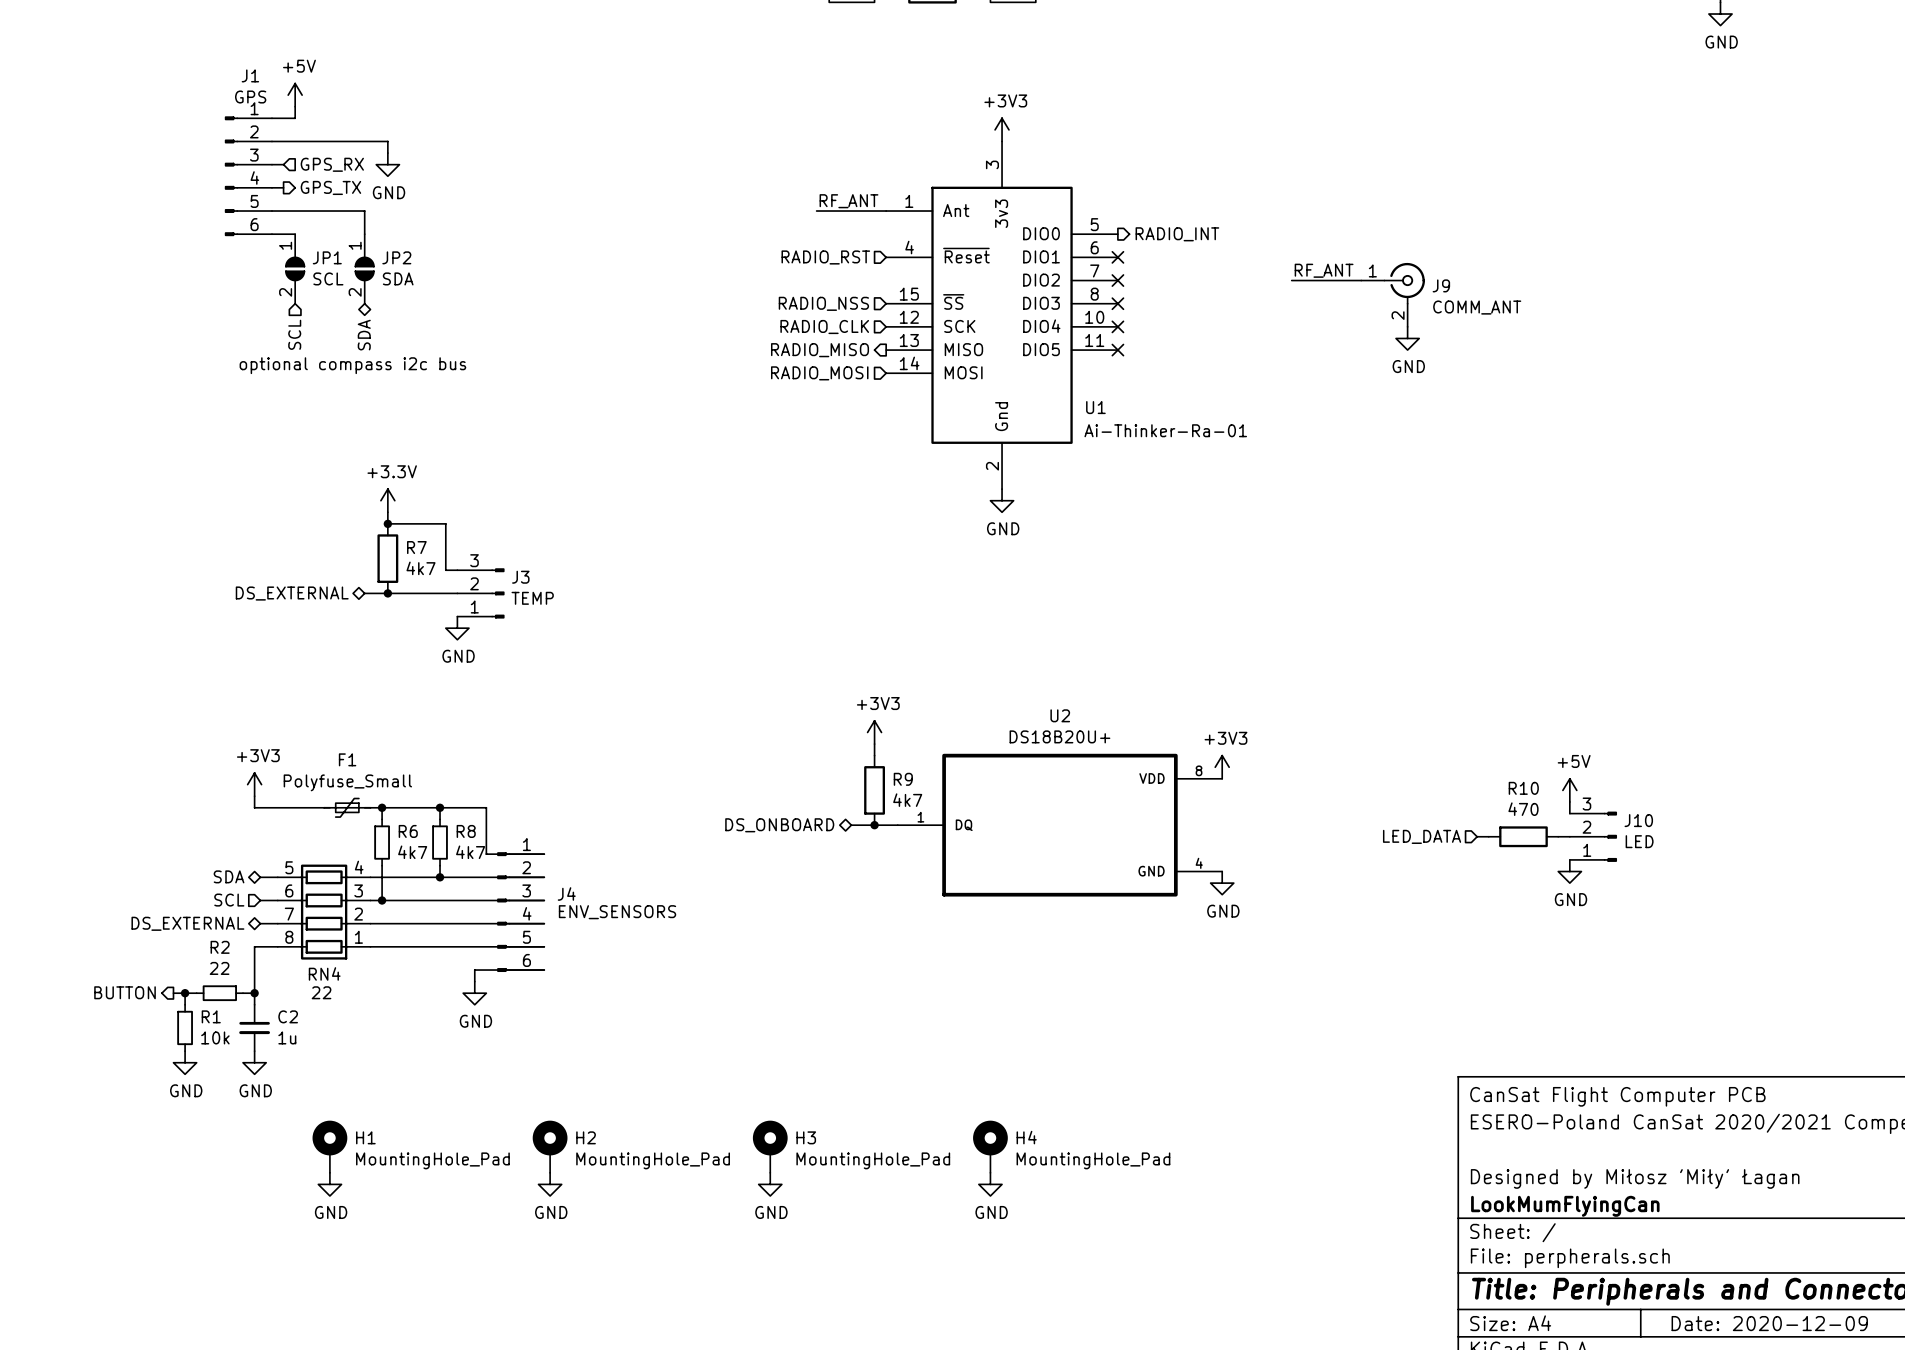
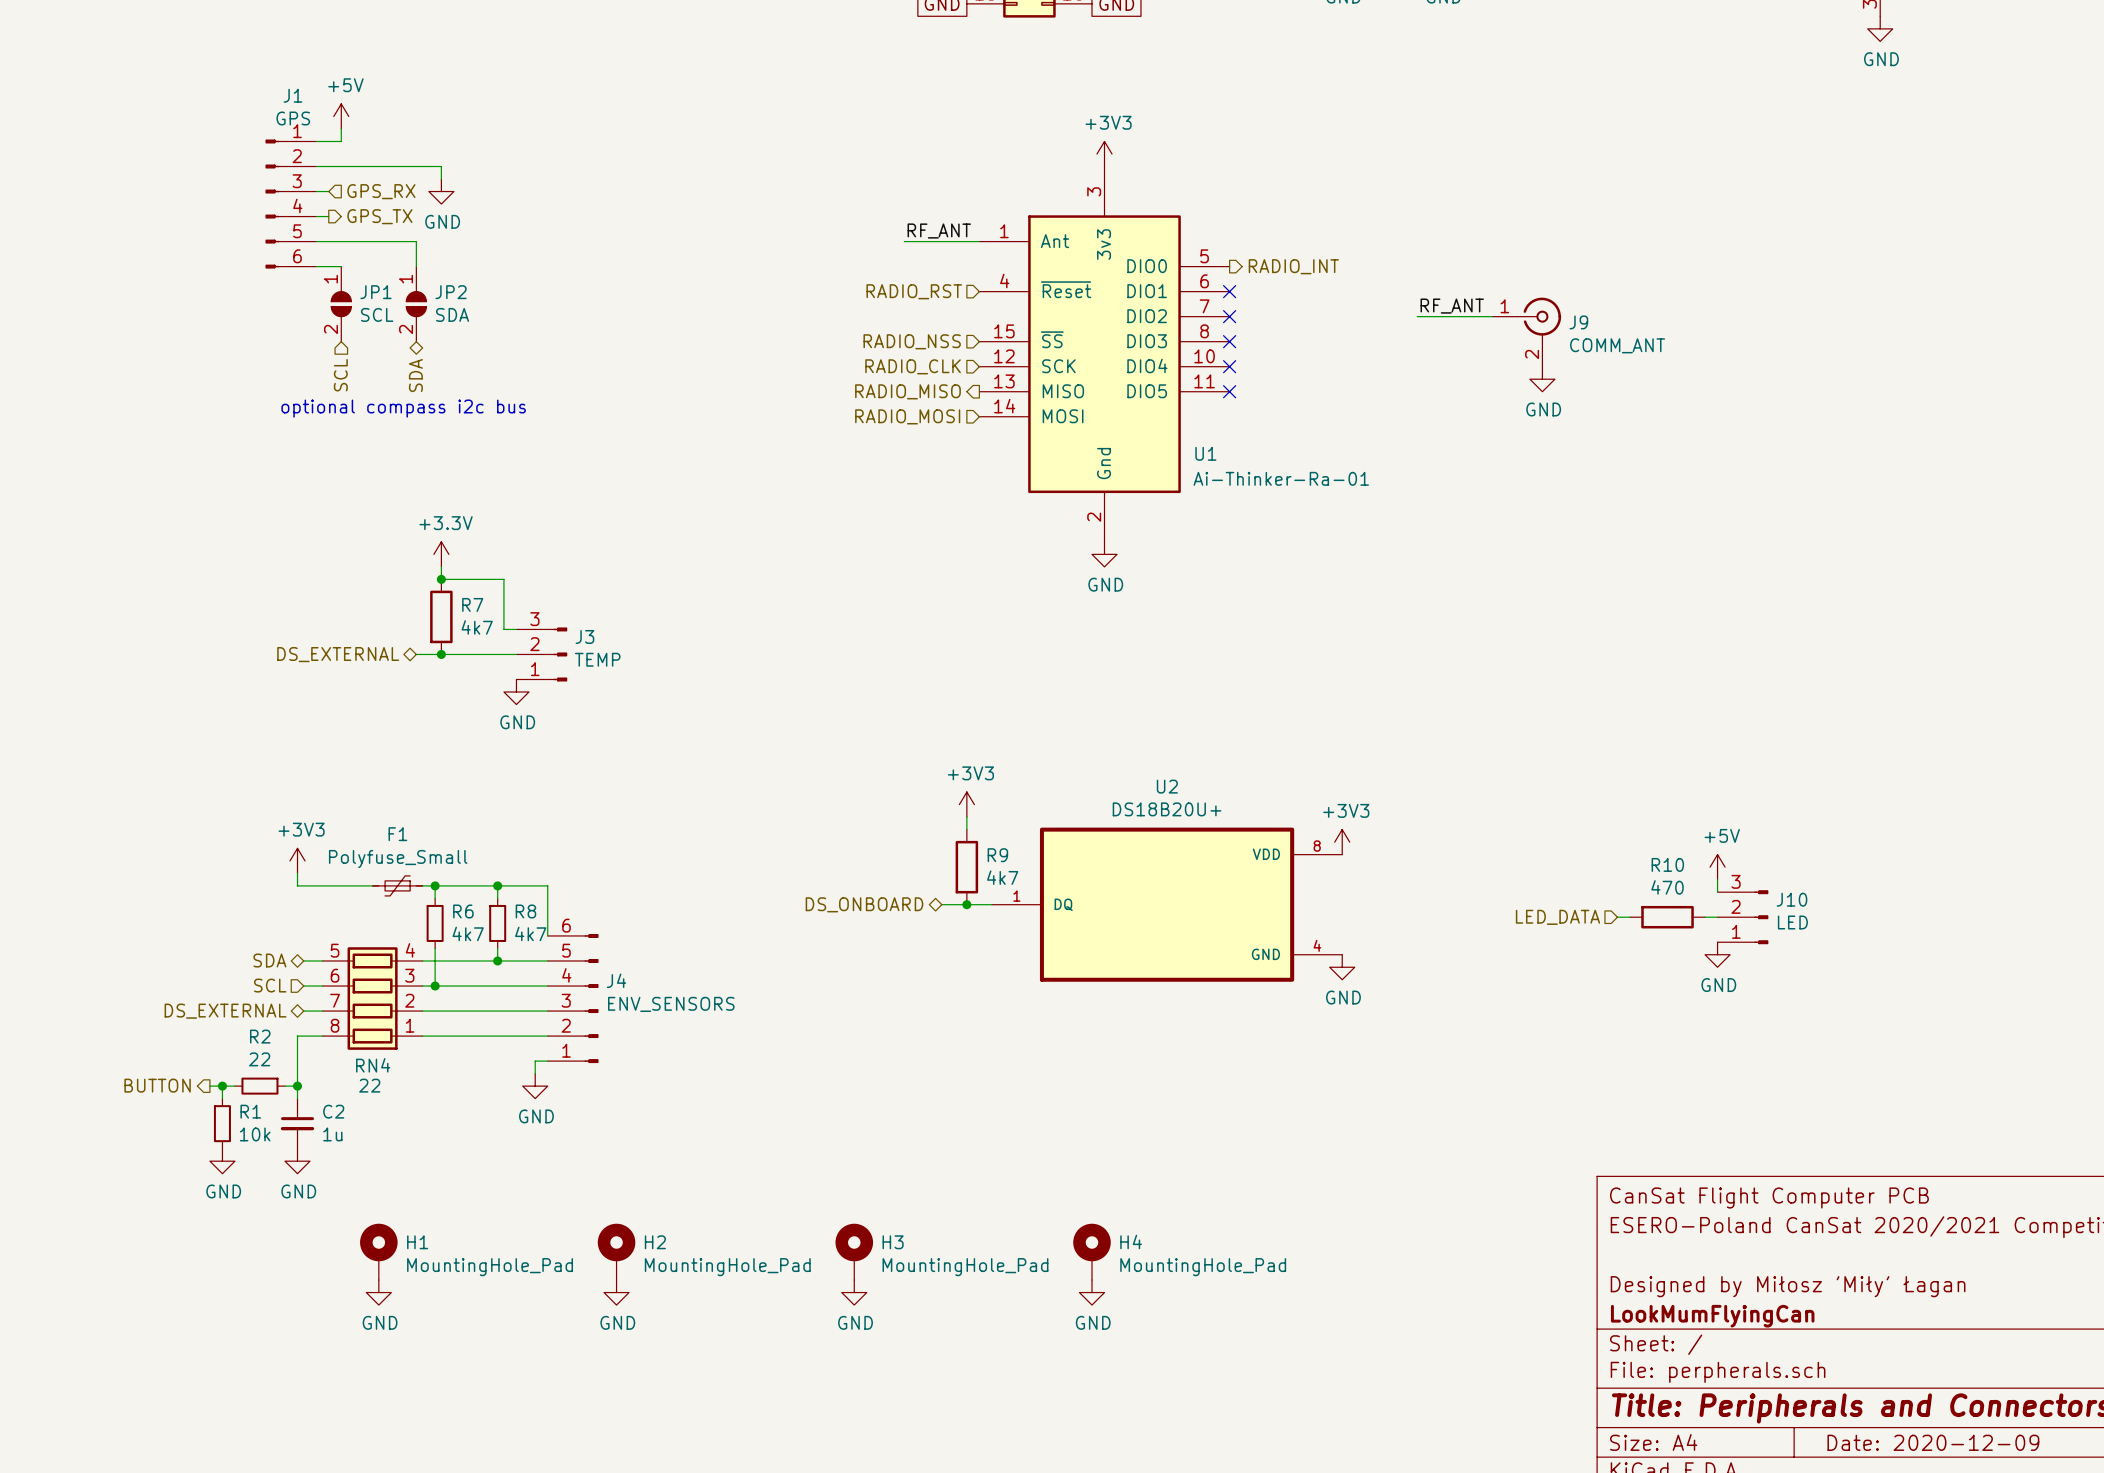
J4 rotation: 0° (503, 912) -> 180° (591, 998)

